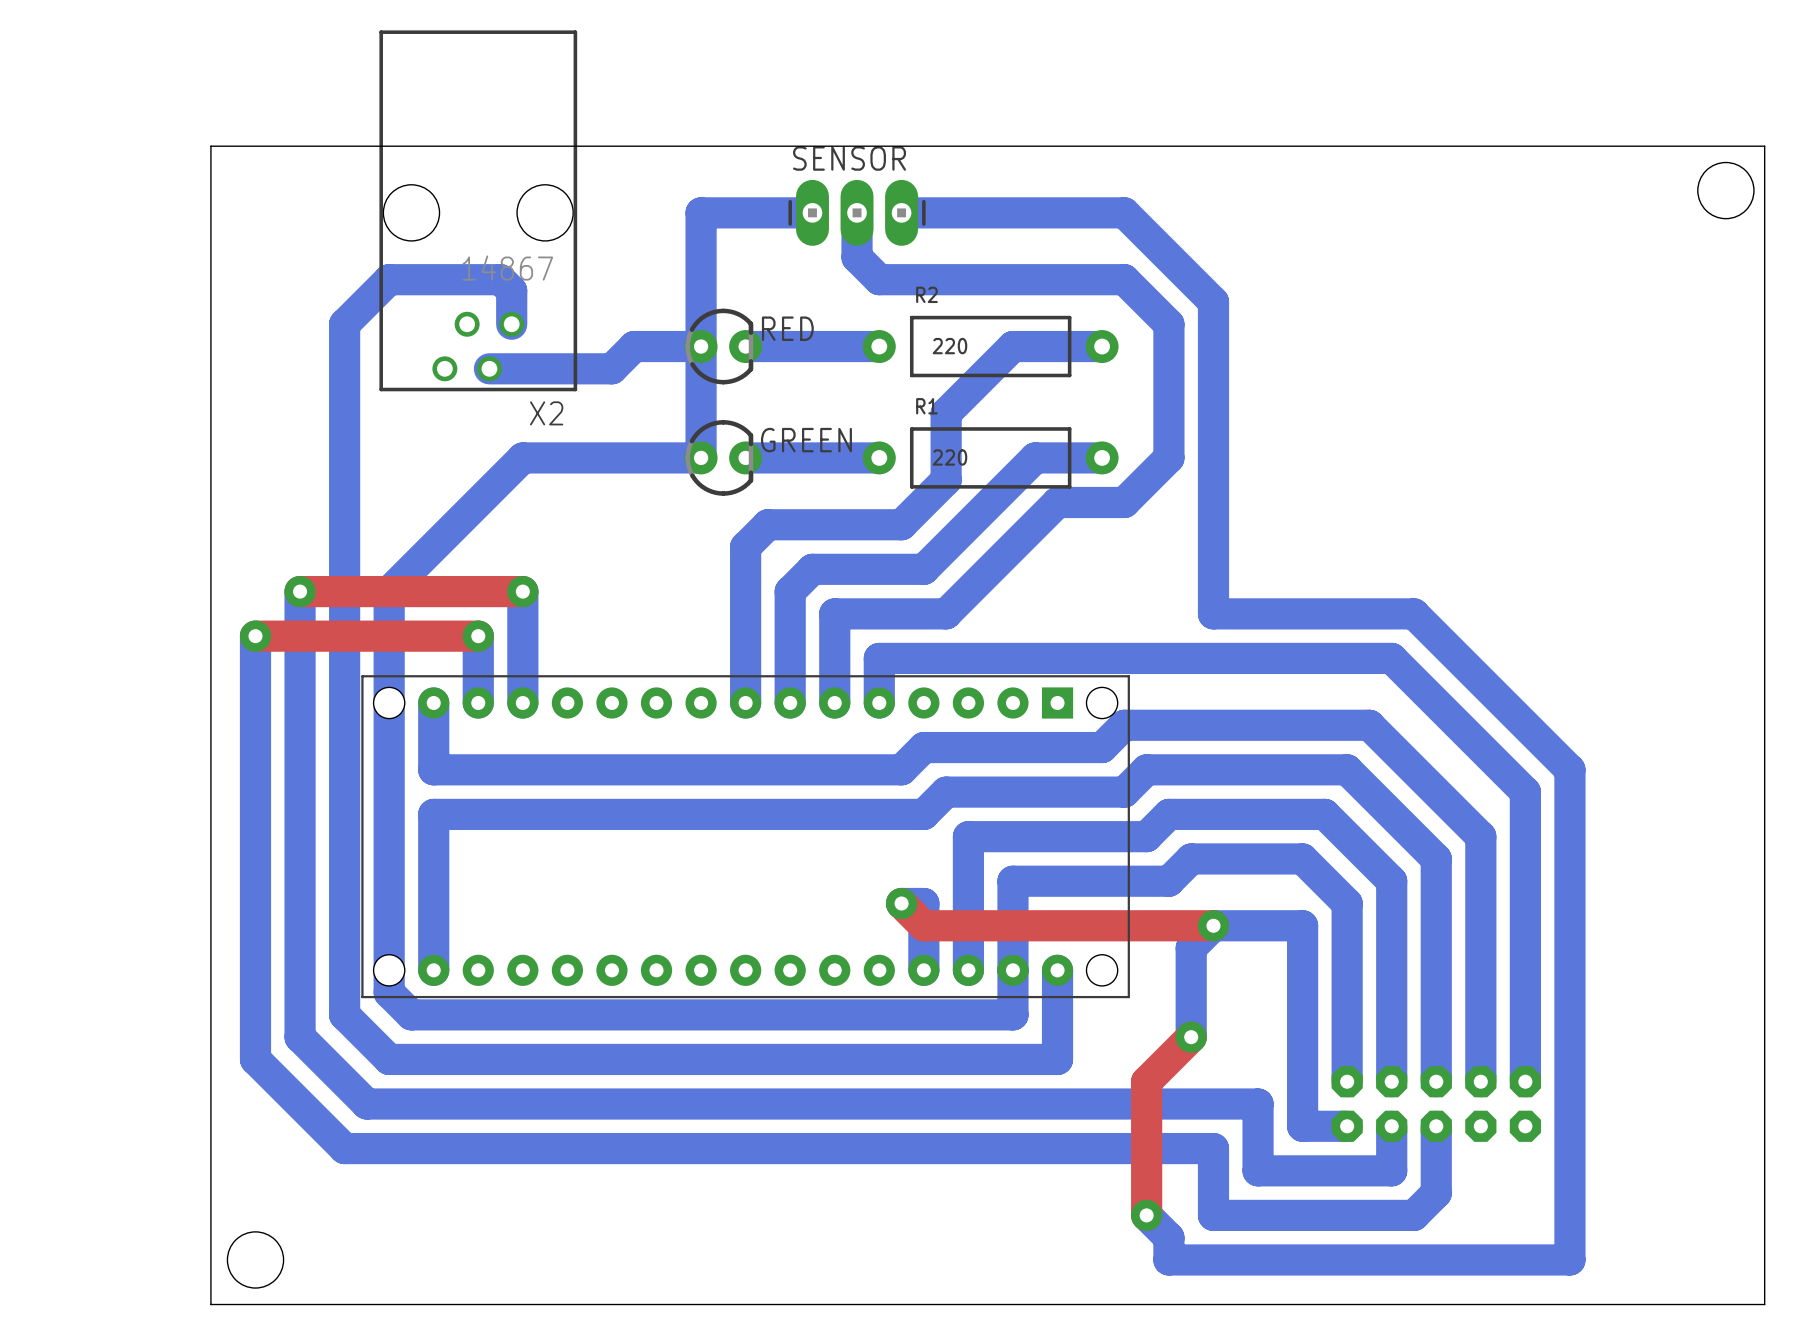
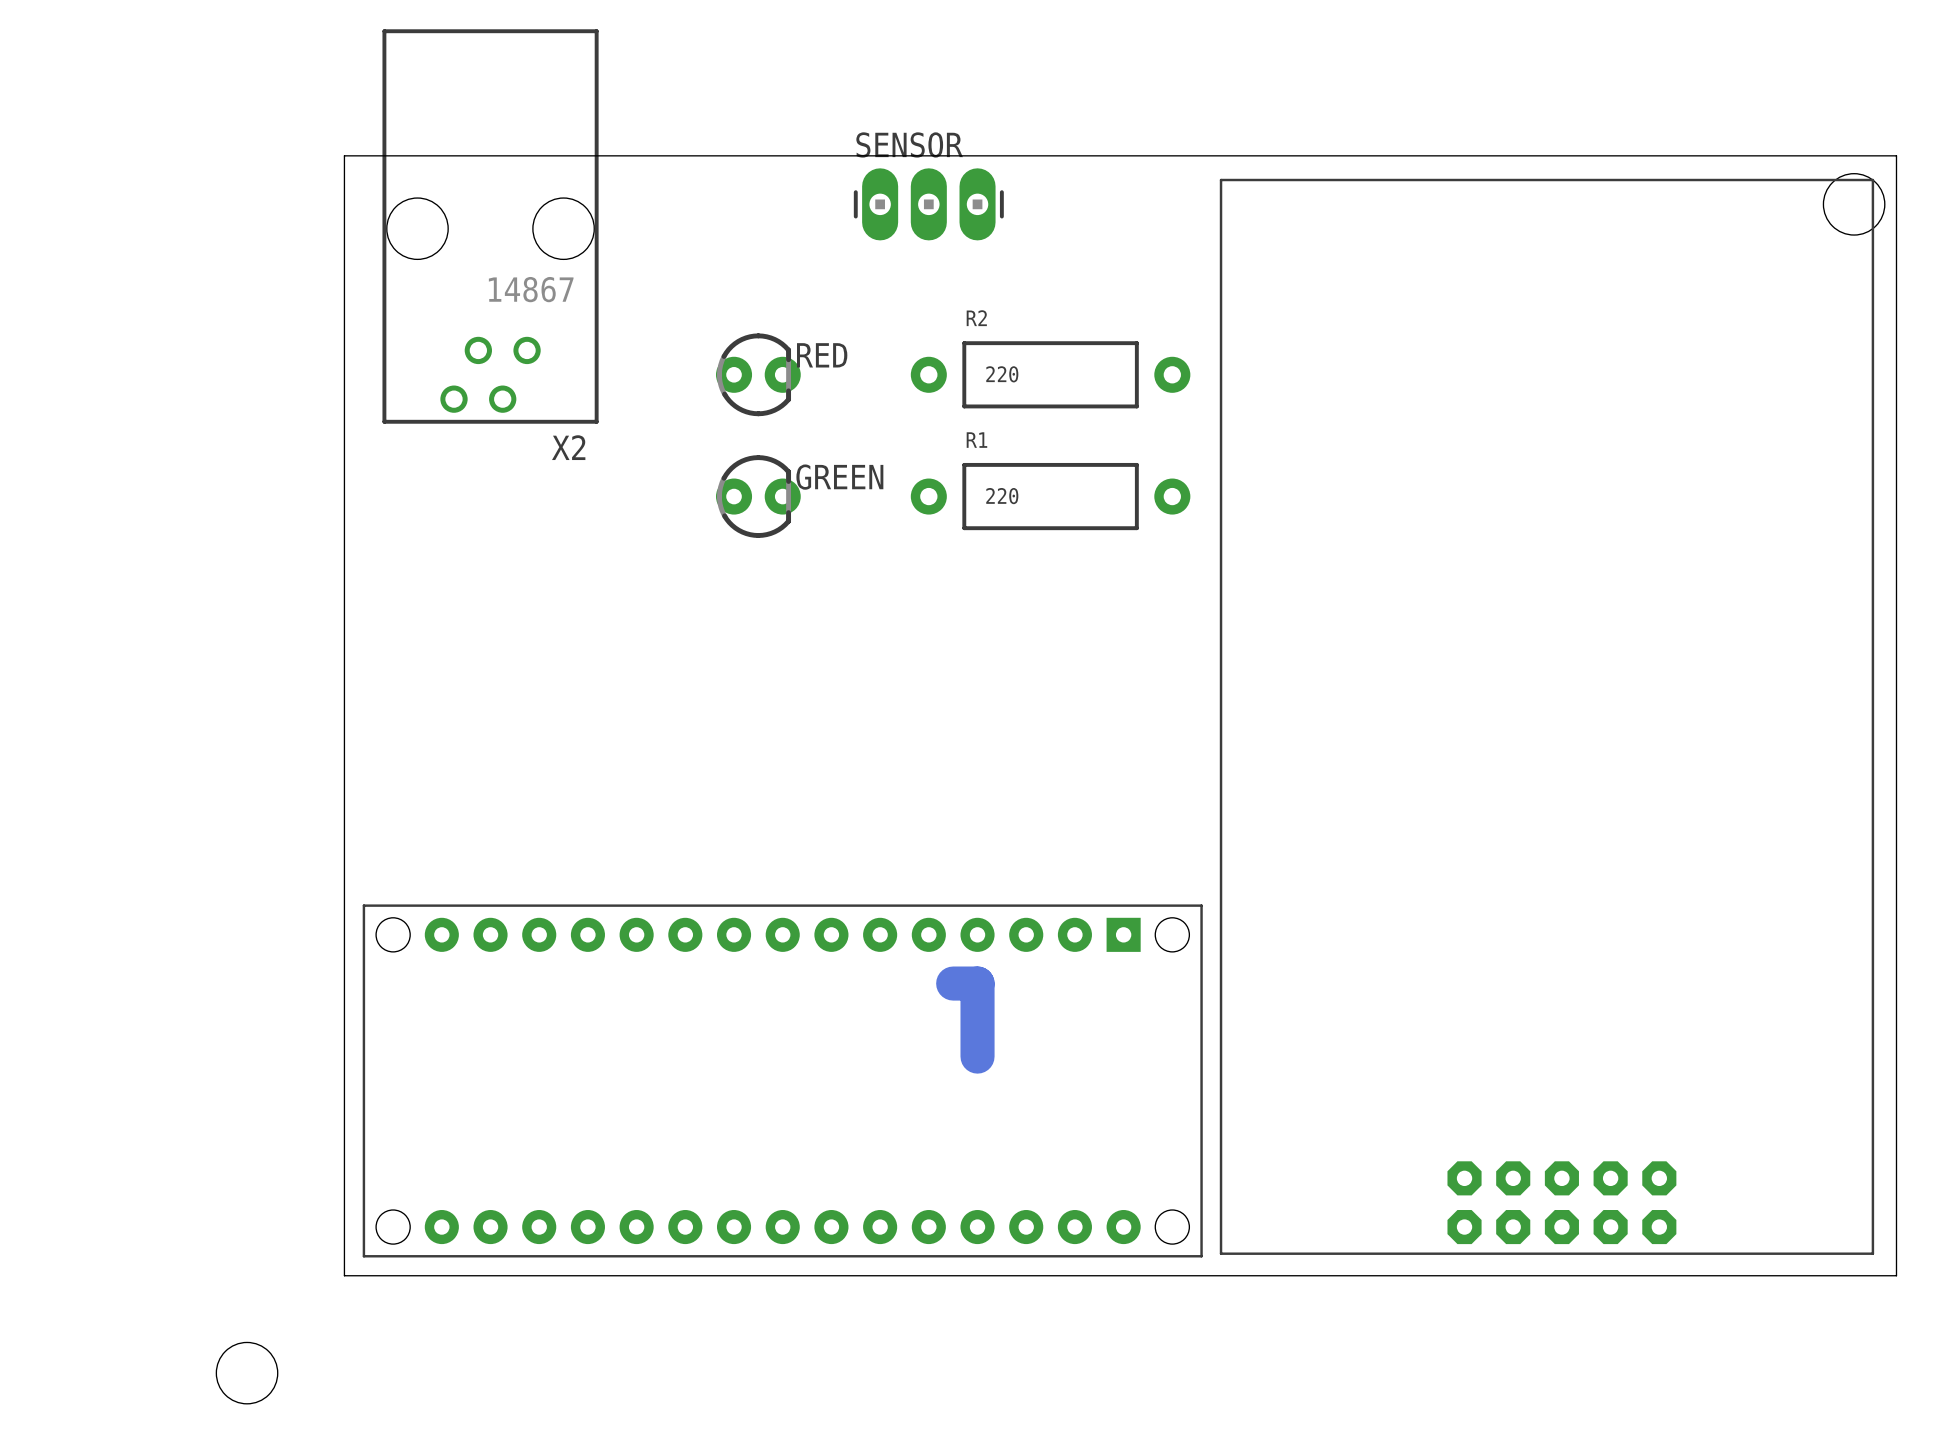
board edge: (344, 146) (210, 146) (210, 1304) (1764, 1304) (1764, 1170) -> (344, 155) (344, 1275) (1896, 1275)
bottom track: (812, 212) (701, 212) (701, 457) (522, 457) (389, 591) (389, 992) (411, 1014) (1012, 1014) (1012, 881) (1168, 881) (1191, 858) (1302, 858) (1347, 903) (1347, 1081) -> none
bottom track: (857, 212) (857, 257) (879, 279) (1124, 279) (1168, 324) (1168, 457) (1124, 502) (1057, 502) (946, 613) (834, 613) (834, 702) -> none
SENSOR position: (857, 212) -> (928, 204)
bottom track: (901, 212) (1124, 212) (1213, 301) (1213, 613) (1413, 613) (1569, 769) (1569, 1259) (1168, 1259) (1168, 1237) (1146, 1215) -> none
bottom track: (511, 324) (511, 290) (500, 279) (389, 279) (344, 324) (344, 1014) (389, 1059) (1057, 1059) (1057, 970) -> none
bottom track: (701, 346) (634, 346) (611, 368) (489, 368) -> none
bottom track: (745, 346) (879, 346) -> none
bottom track: (1102, 346) (1012, 346) (946, 413) (946, 480) (901, 524) (767, 524) (745, 547) (745, 702) -> none
bottom track: (745, 457) (879, 457) -> none
bottom track: (1102, 457) (1035, 457) (923, 569) (812, 569) (790, 591) (790, 702) -> none
bottom track: (300, 591) (300, 1037) (366, 1104) (1258, 1104) (1258, 1170) (1391, 1170) (1391, 1126) -> none
top track: (300, 591) (522, 591) -> none
via: (300, 591) -> none
bottom track: (522, 591) (522, 702) -> none
via: (522, 591) -> none
bottom track: (255, 636) (255, 1059) (344, 1148) (1213, 1148) (1213, 1215) (1413, 1215) (1436, 1193) (1436, 1126) -> none
top track: (255, 636) (478, 636) -> none
via: (255, 636) -> none
bottom track: (478, 636) (478, 702) -> none
via: (478, 636) -> none
part: none -> (1546, 716)
bottom track: (433, 702) (433, 769) (901, 769) (923, 747) (1102, 747) (1124, 725) (1369, 725) (1480, 836) (1480, 1081) -> none
bottom track: (879, 702) (879, 658) (1391, 658) (1525, 792) (1525, 1081) -> none
part position: (745, 836) -> (782, 1080)
top track: (901, 903) (923, 925) (1213, 925) -> none
via: (901, 903) -> none
via: (1213, 925) -> none
bottom track: (433, 970) (433, 814) (923, 814) (946, 792) (1124, 792) (1146, 769) (1347, 769) (1436, 858) (1436, 1081) -> none
bottom track: (968, 970) (968, 836) (1146, 836) (1168, 814) (1324, 814) (1391, 881) (1391, 1081) -> none
bottom track: (1191, 1037) (1191, 948) (1213, 925) (1302, 925) (1302, 1126) (1347, 1126) -> none
top track: (1191, 1037) (1146, 1081) (1146, 1215) -> none
via: (1191, 1037) -> none
part: (1436, 1104) -> none
via: (1146, 1215) -> none

